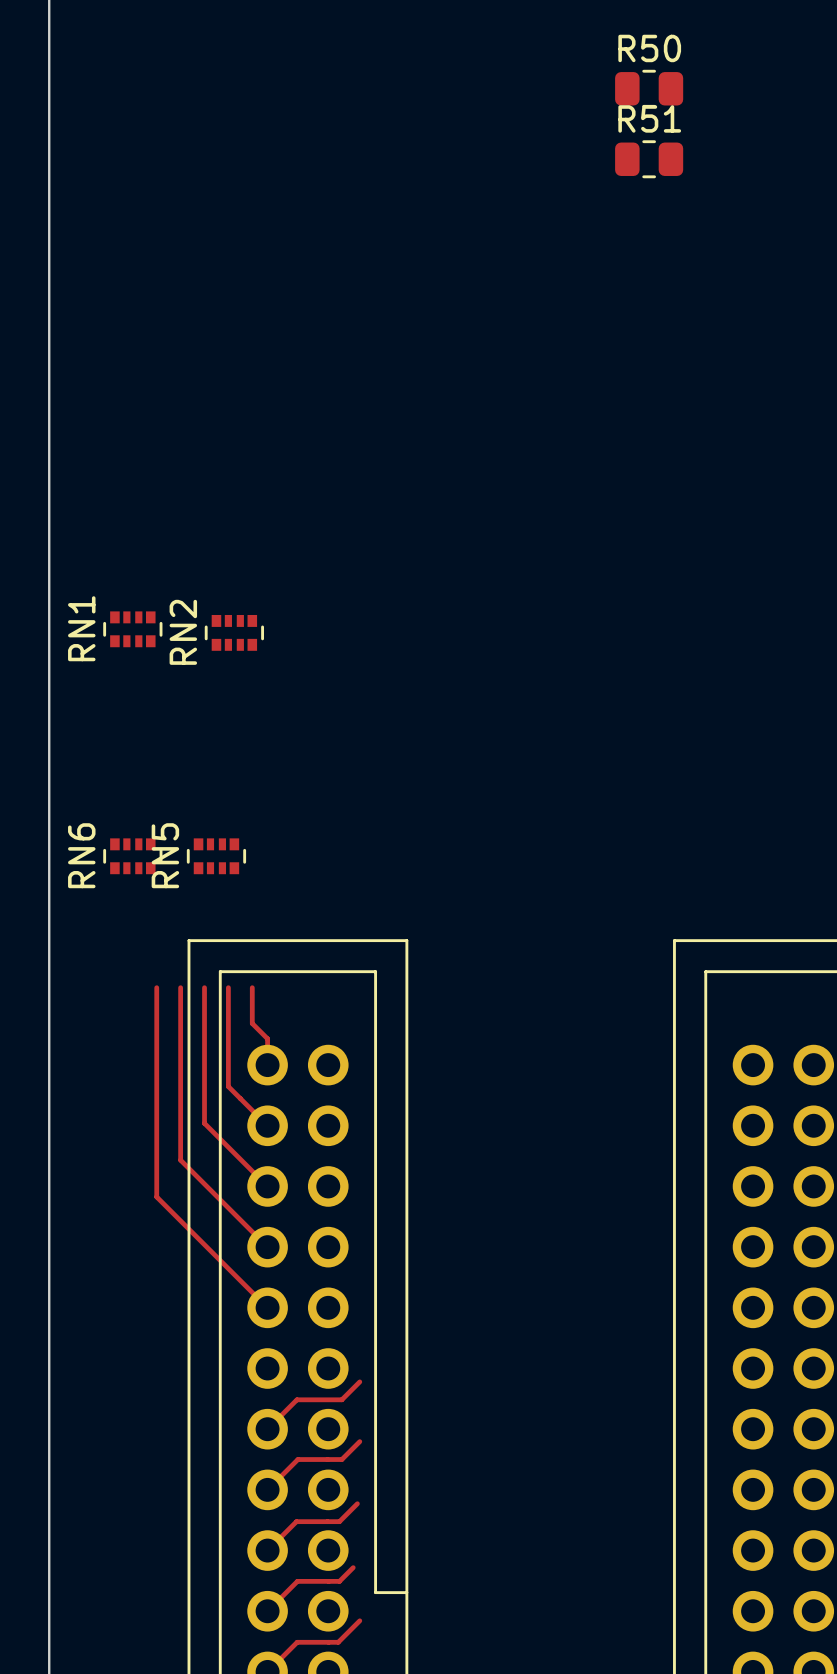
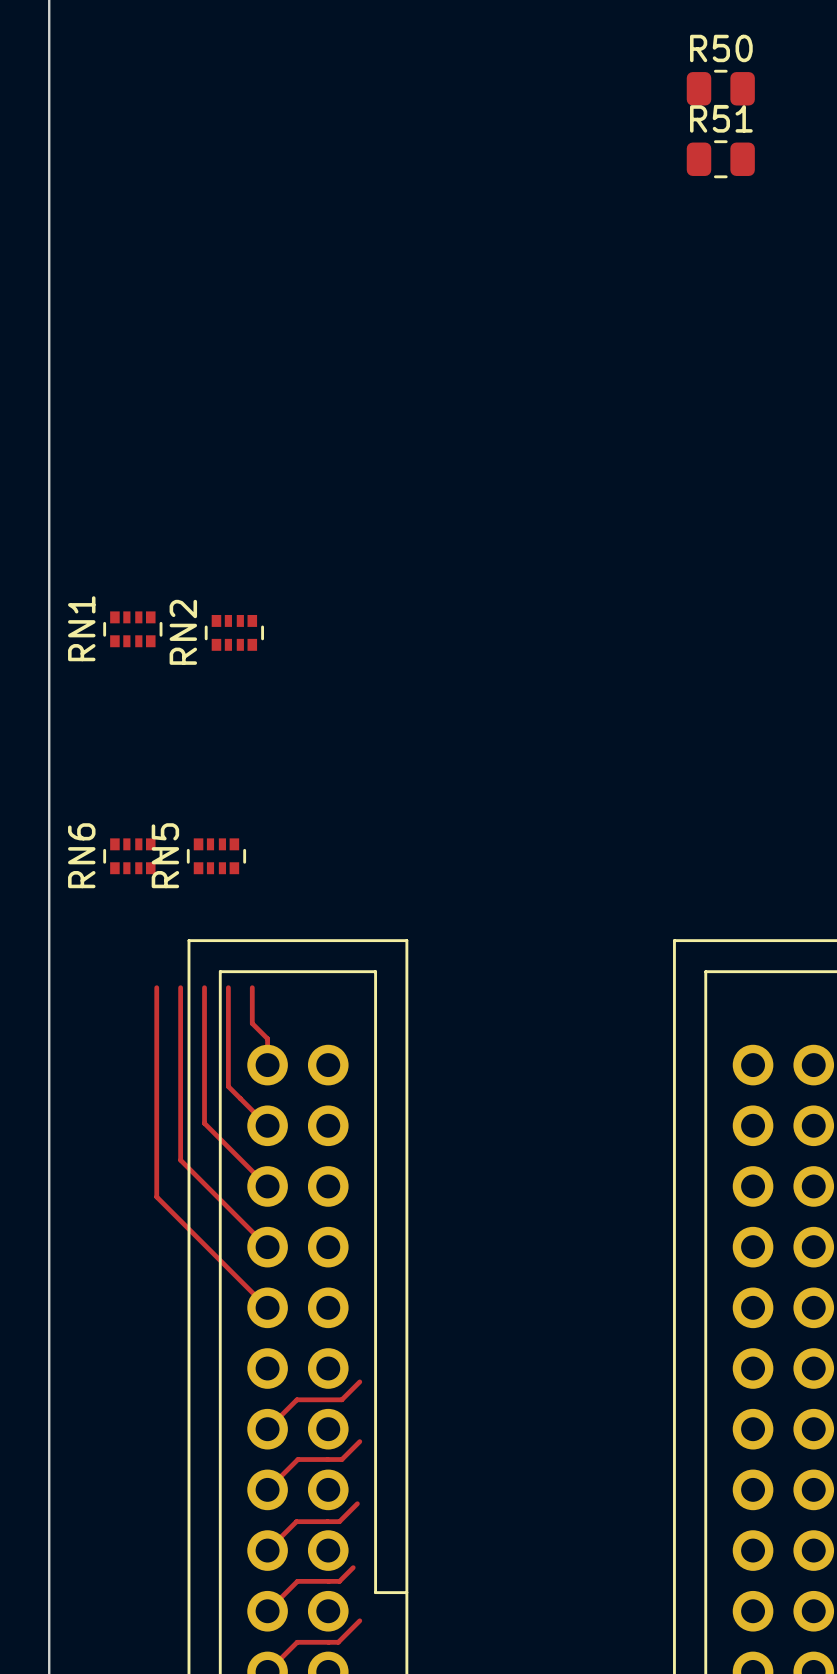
R50 position: (649, 88) -> (720, 88)
R51 position: (649, 159) -> (720, 159)

